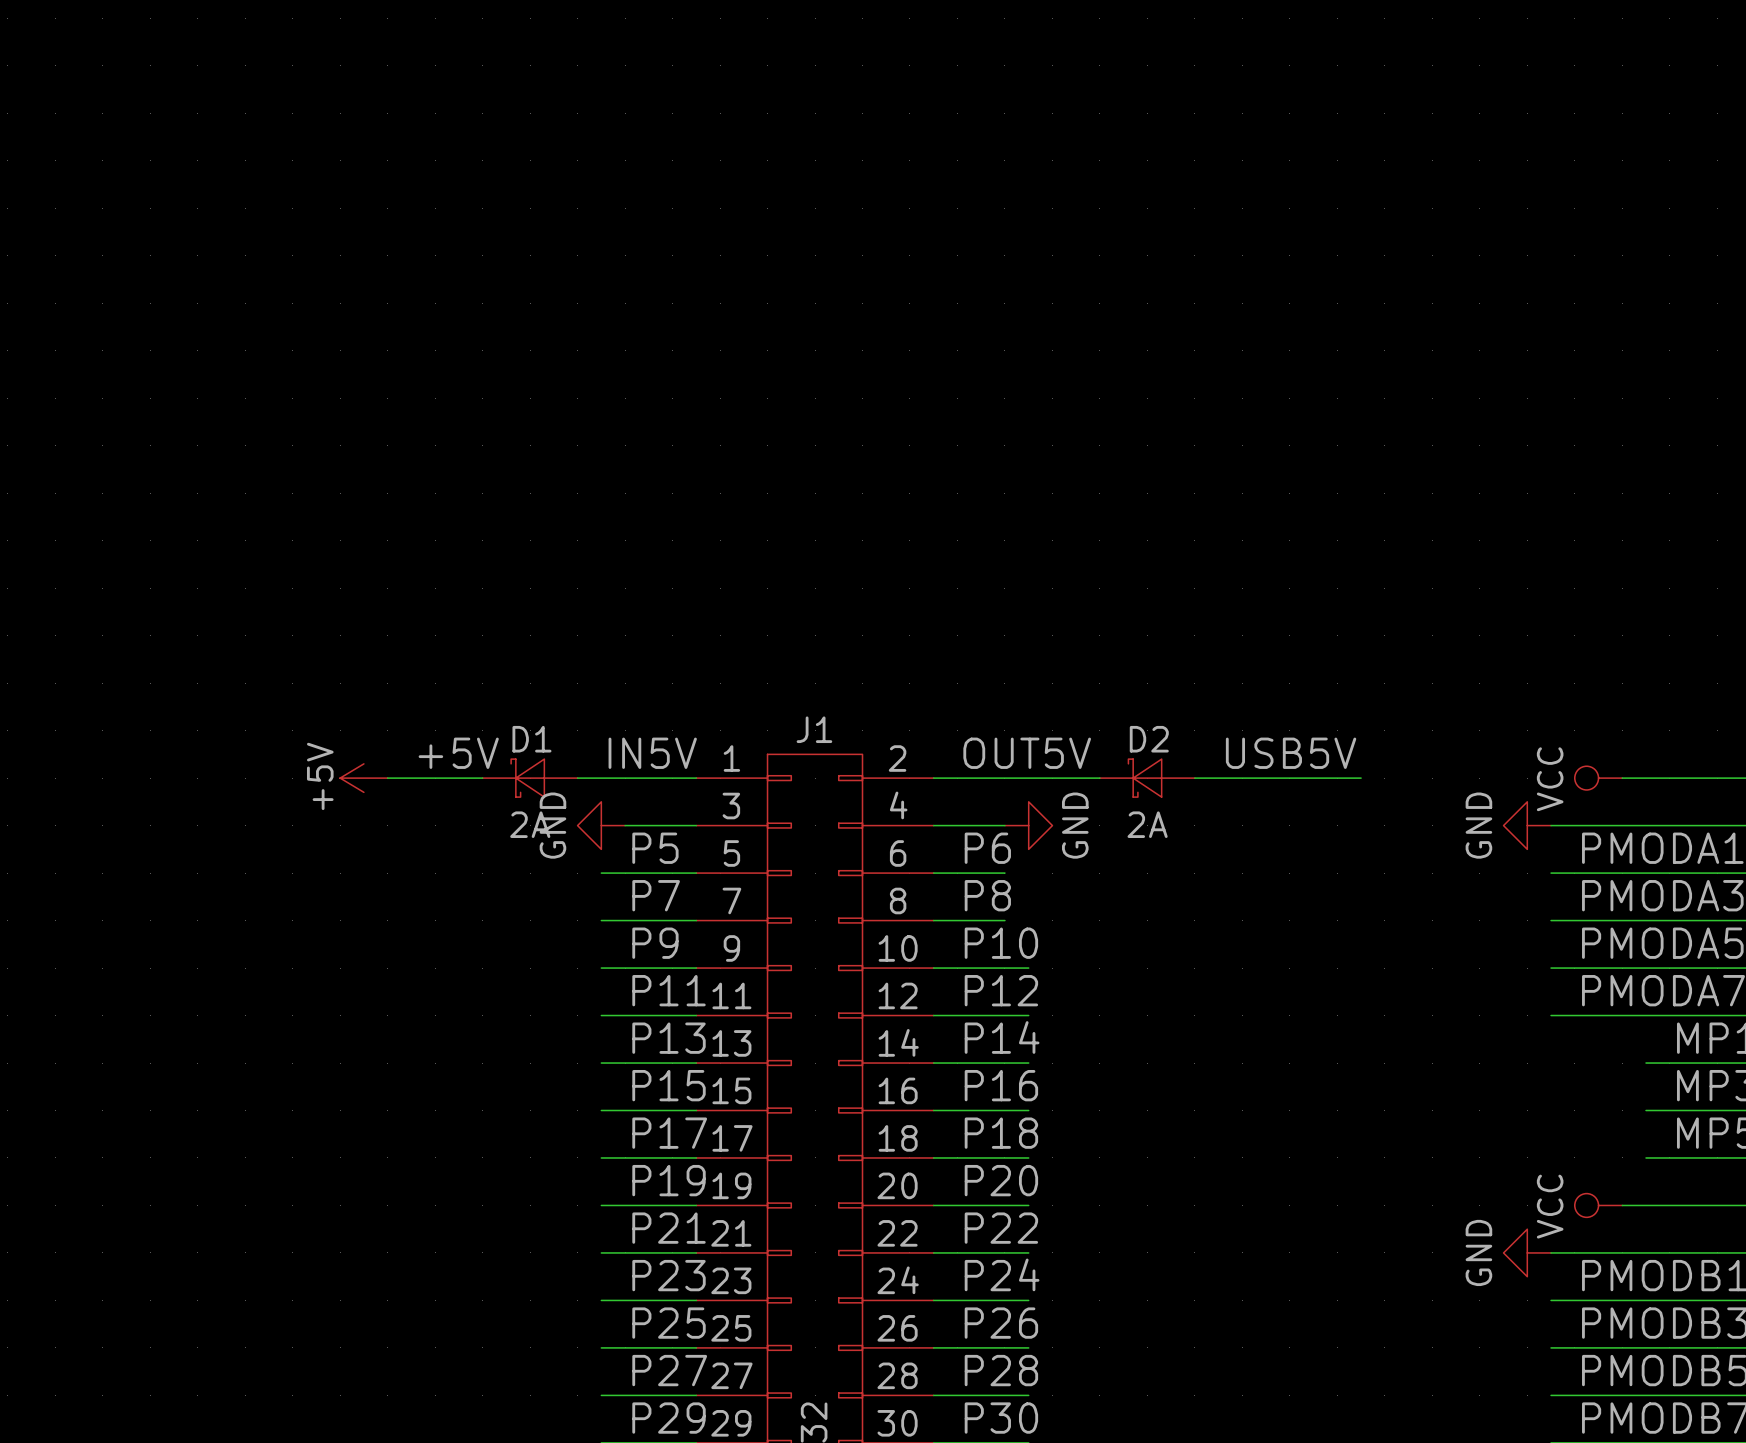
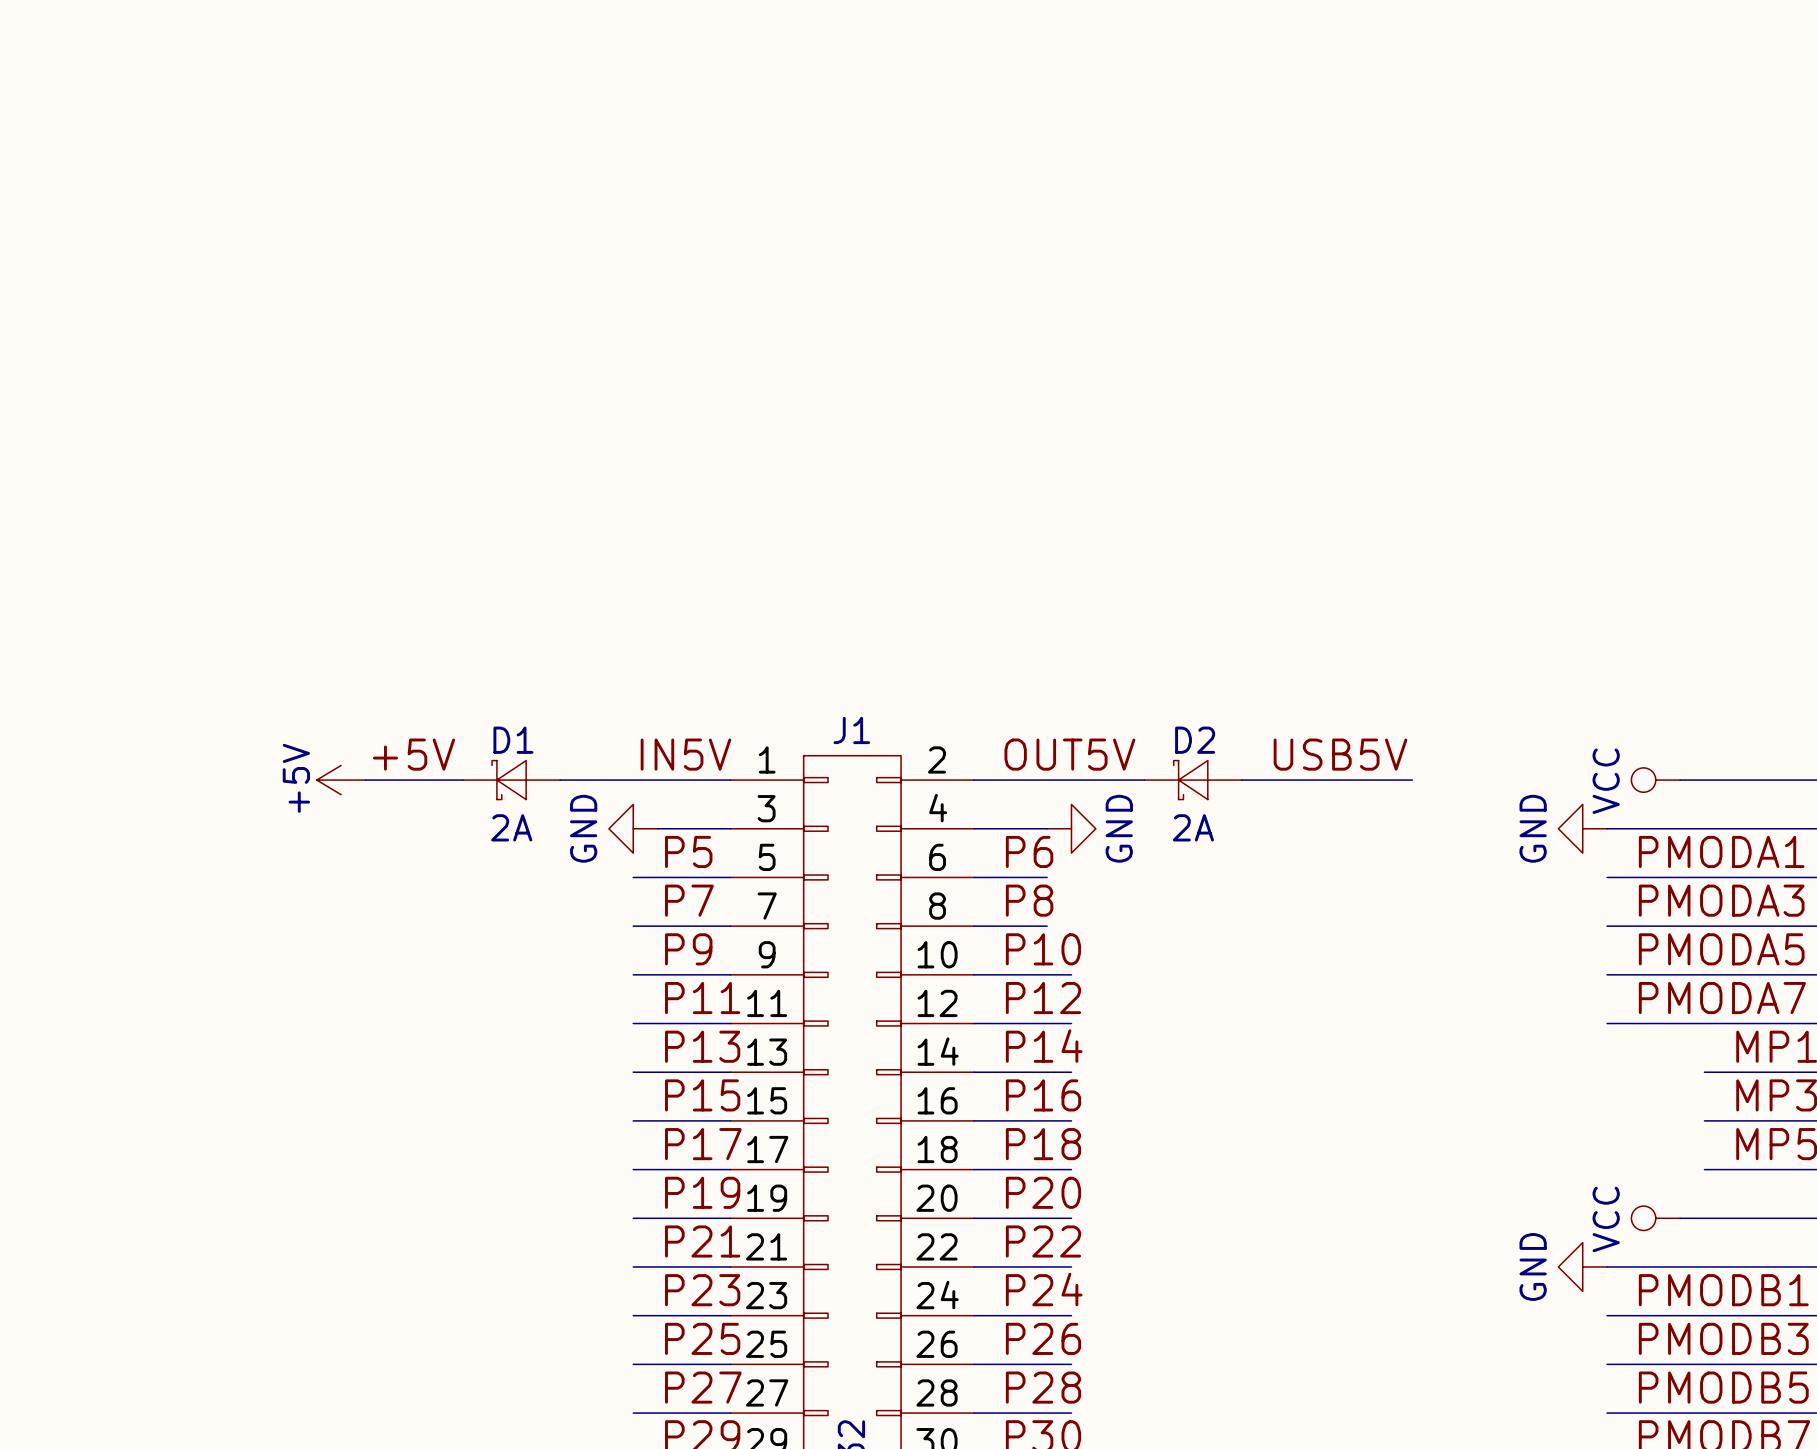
label position: +5V (458, 753) -> +5V (413, 754)
power symbol position: +5V (363, 778) -> +5V (341, 780)
D1 position: (530, 778) -> (511, 780)

